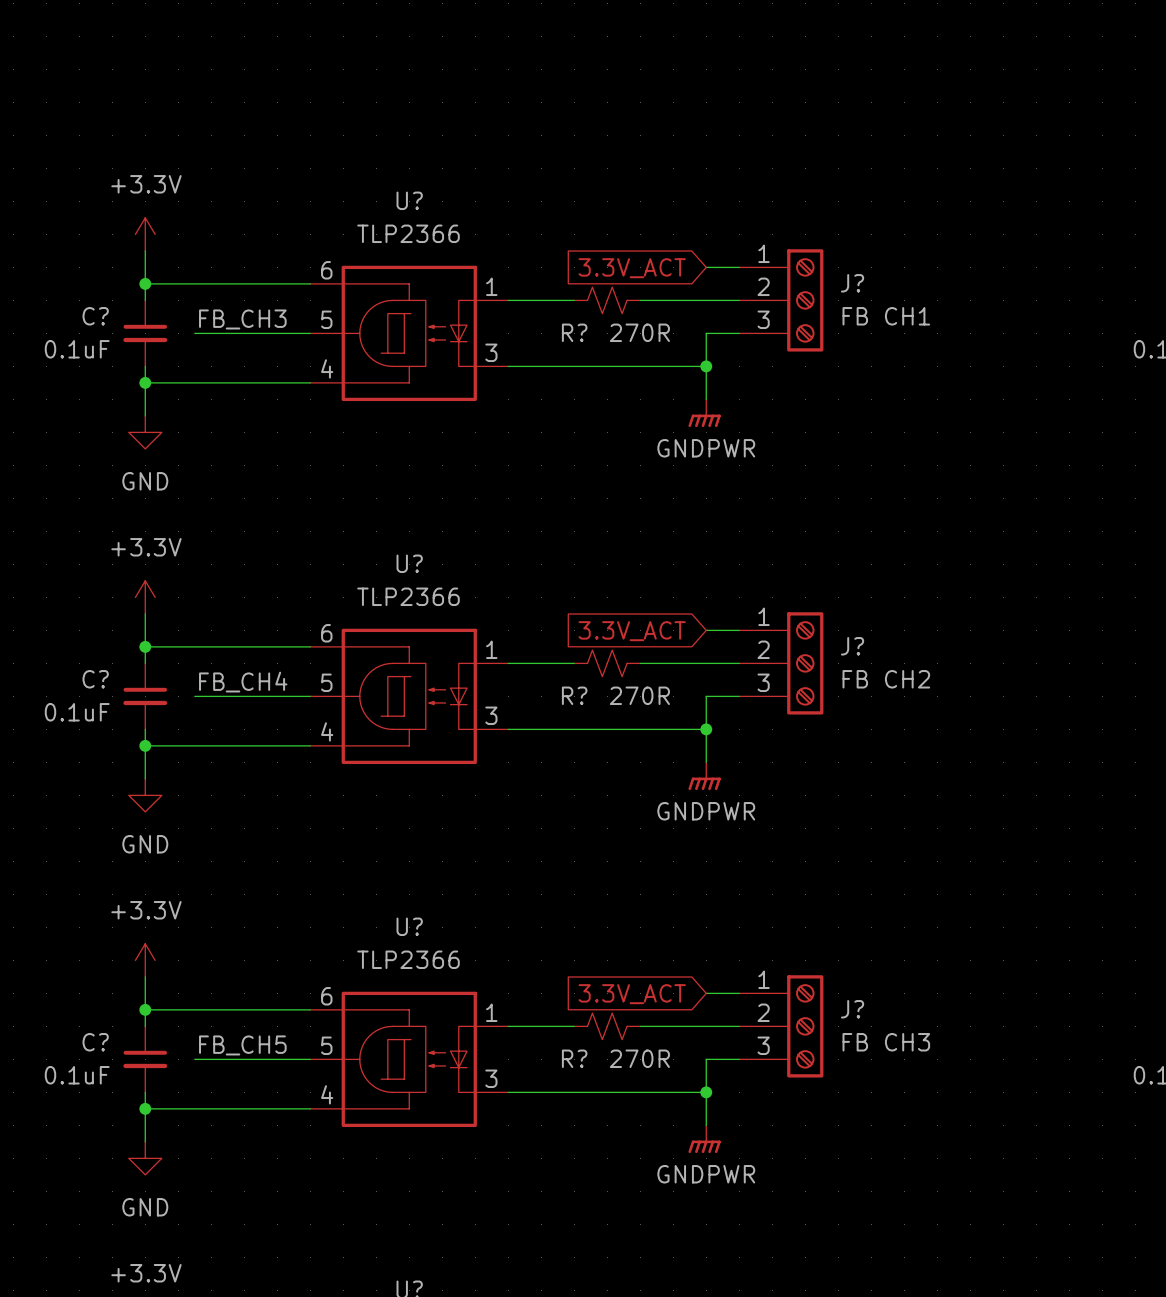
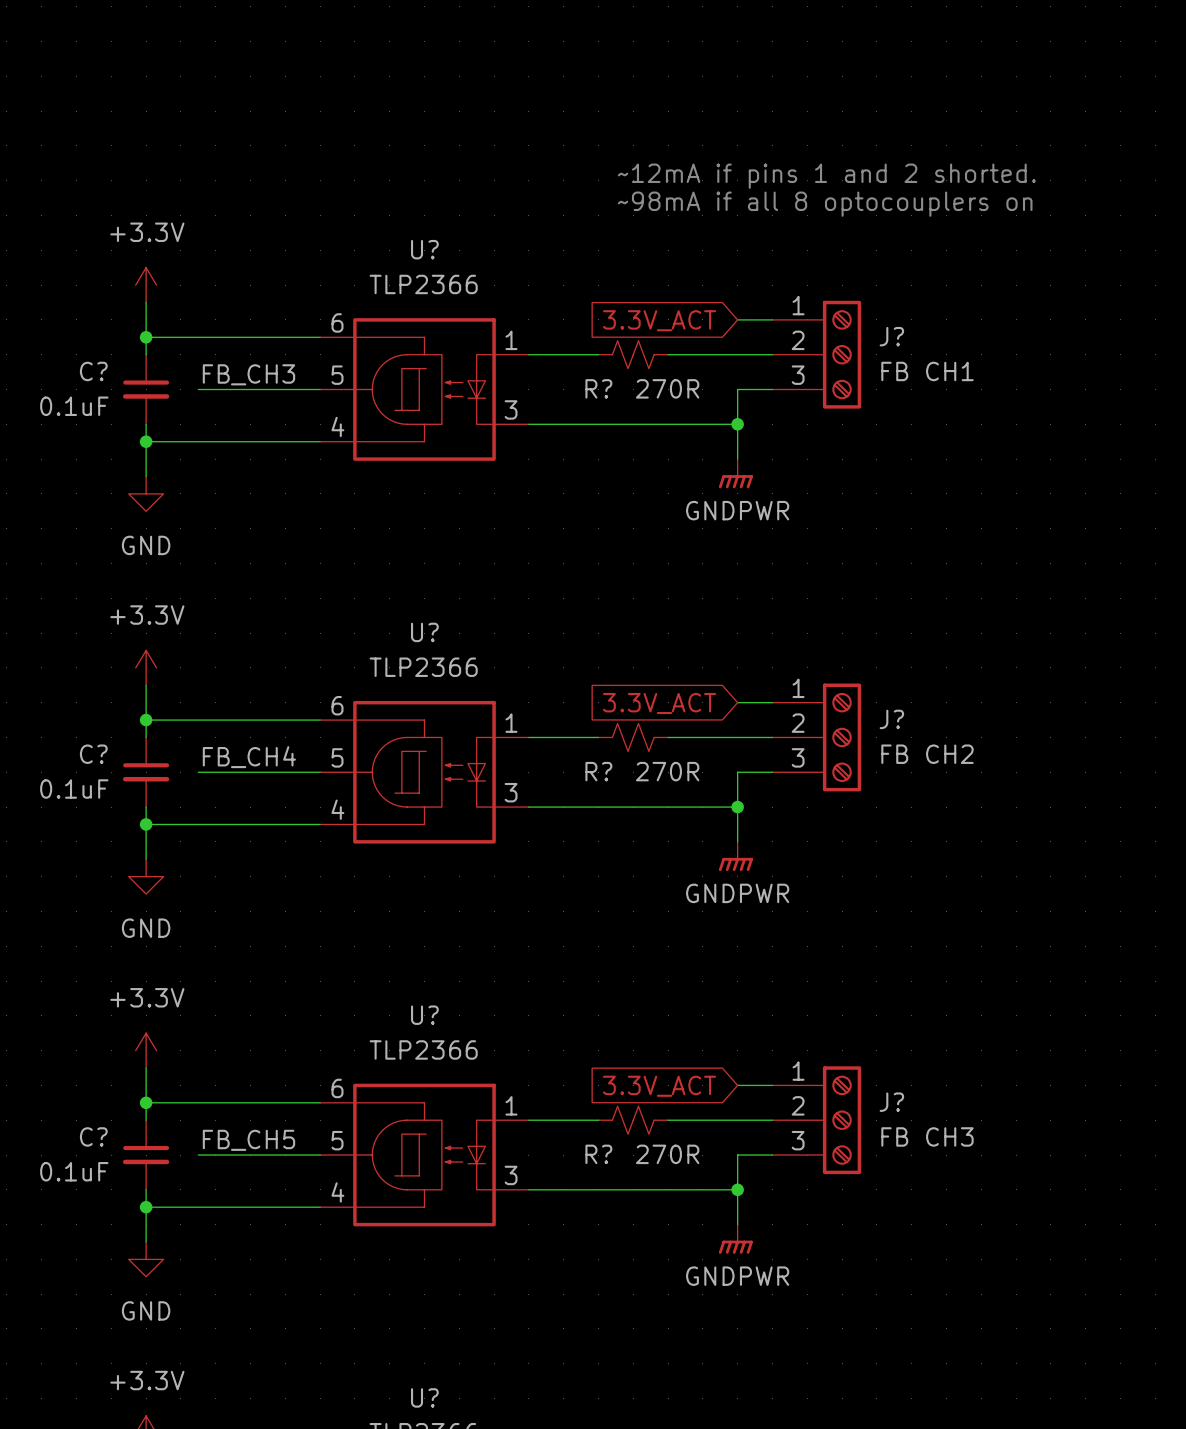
text: none -> ~12mA if pins 1 and 2 shorted. (826, 176)
text: none -> ~98mA if all 8 optocouplers on (825, 204)

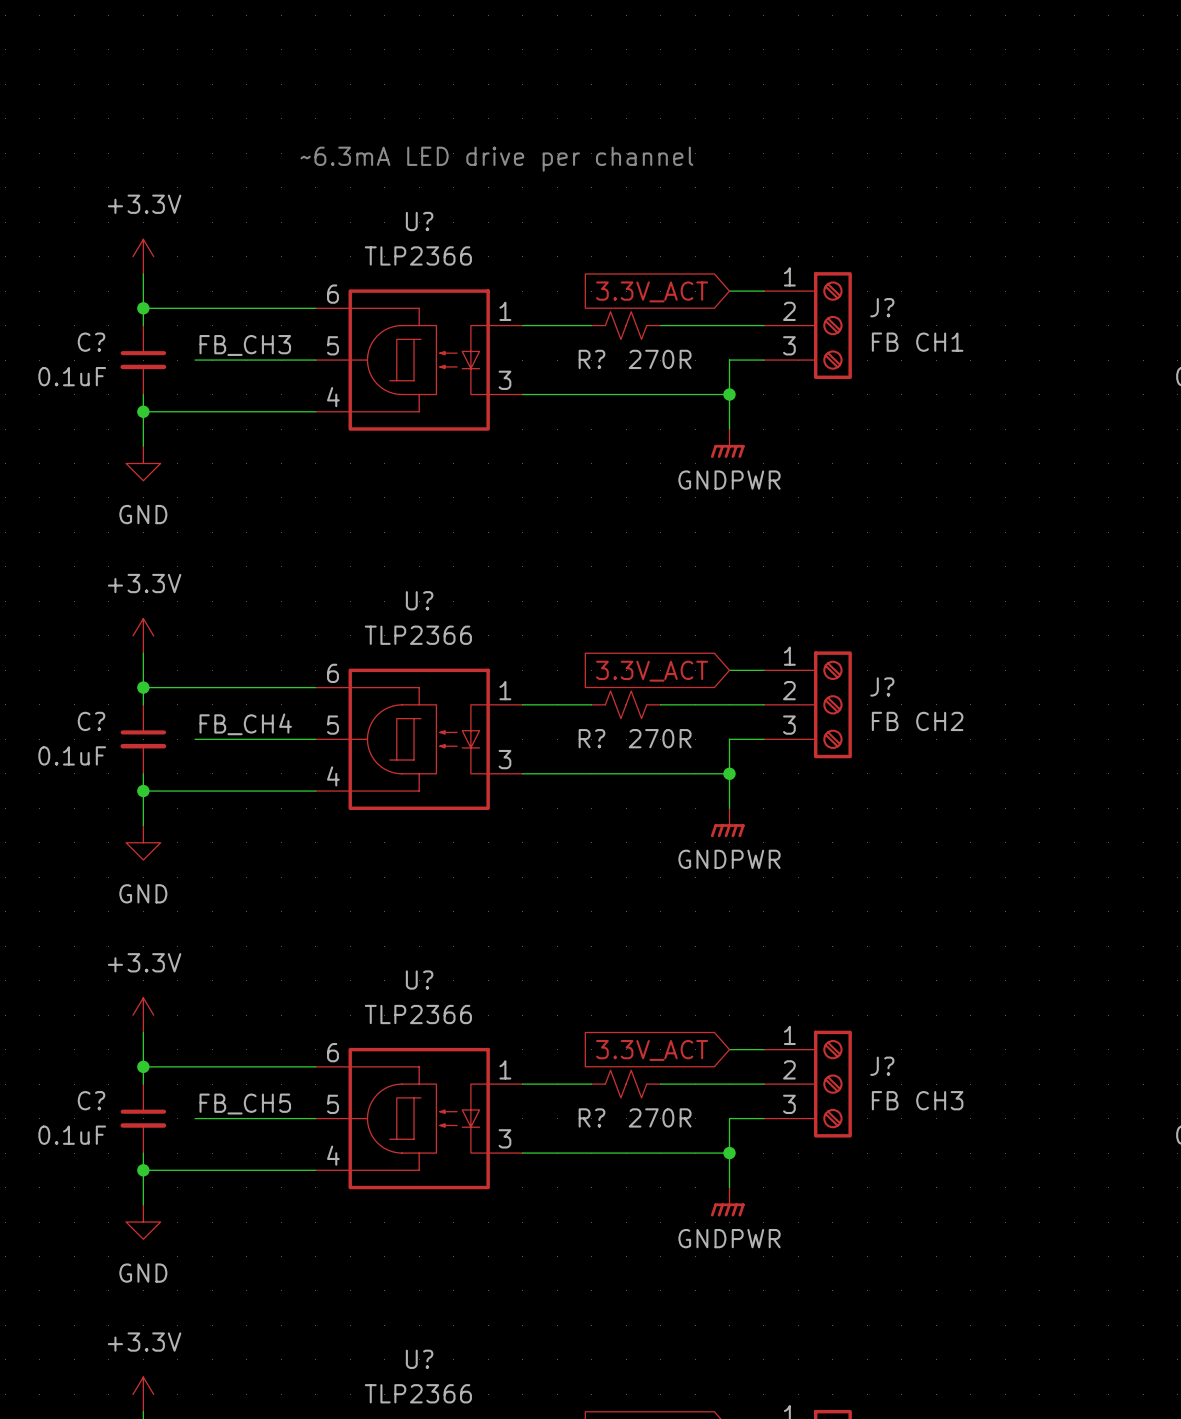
text: ~12mA if pins 1 and 2 shorted. (826, 176) -> none
text: none -> ~6.3mA LED drive per channel (496, 159)
text: ~98mA if all 8 optocouplers on (825, 204) -> none

